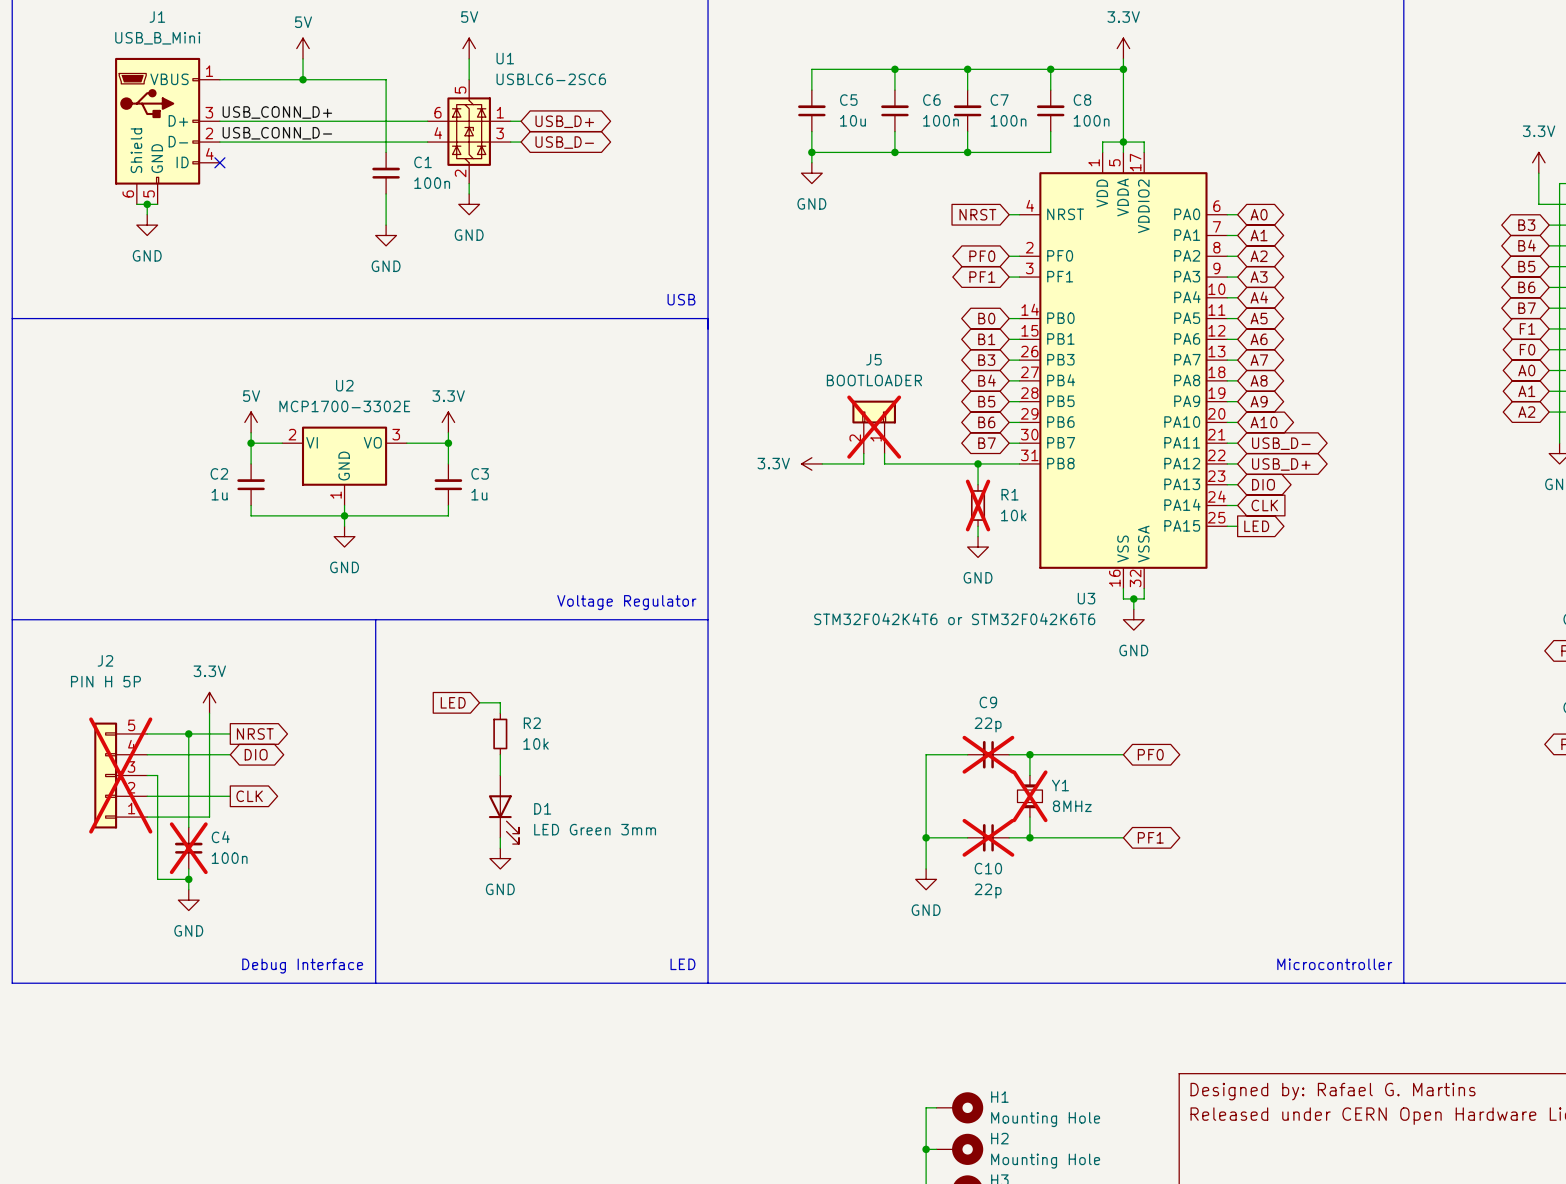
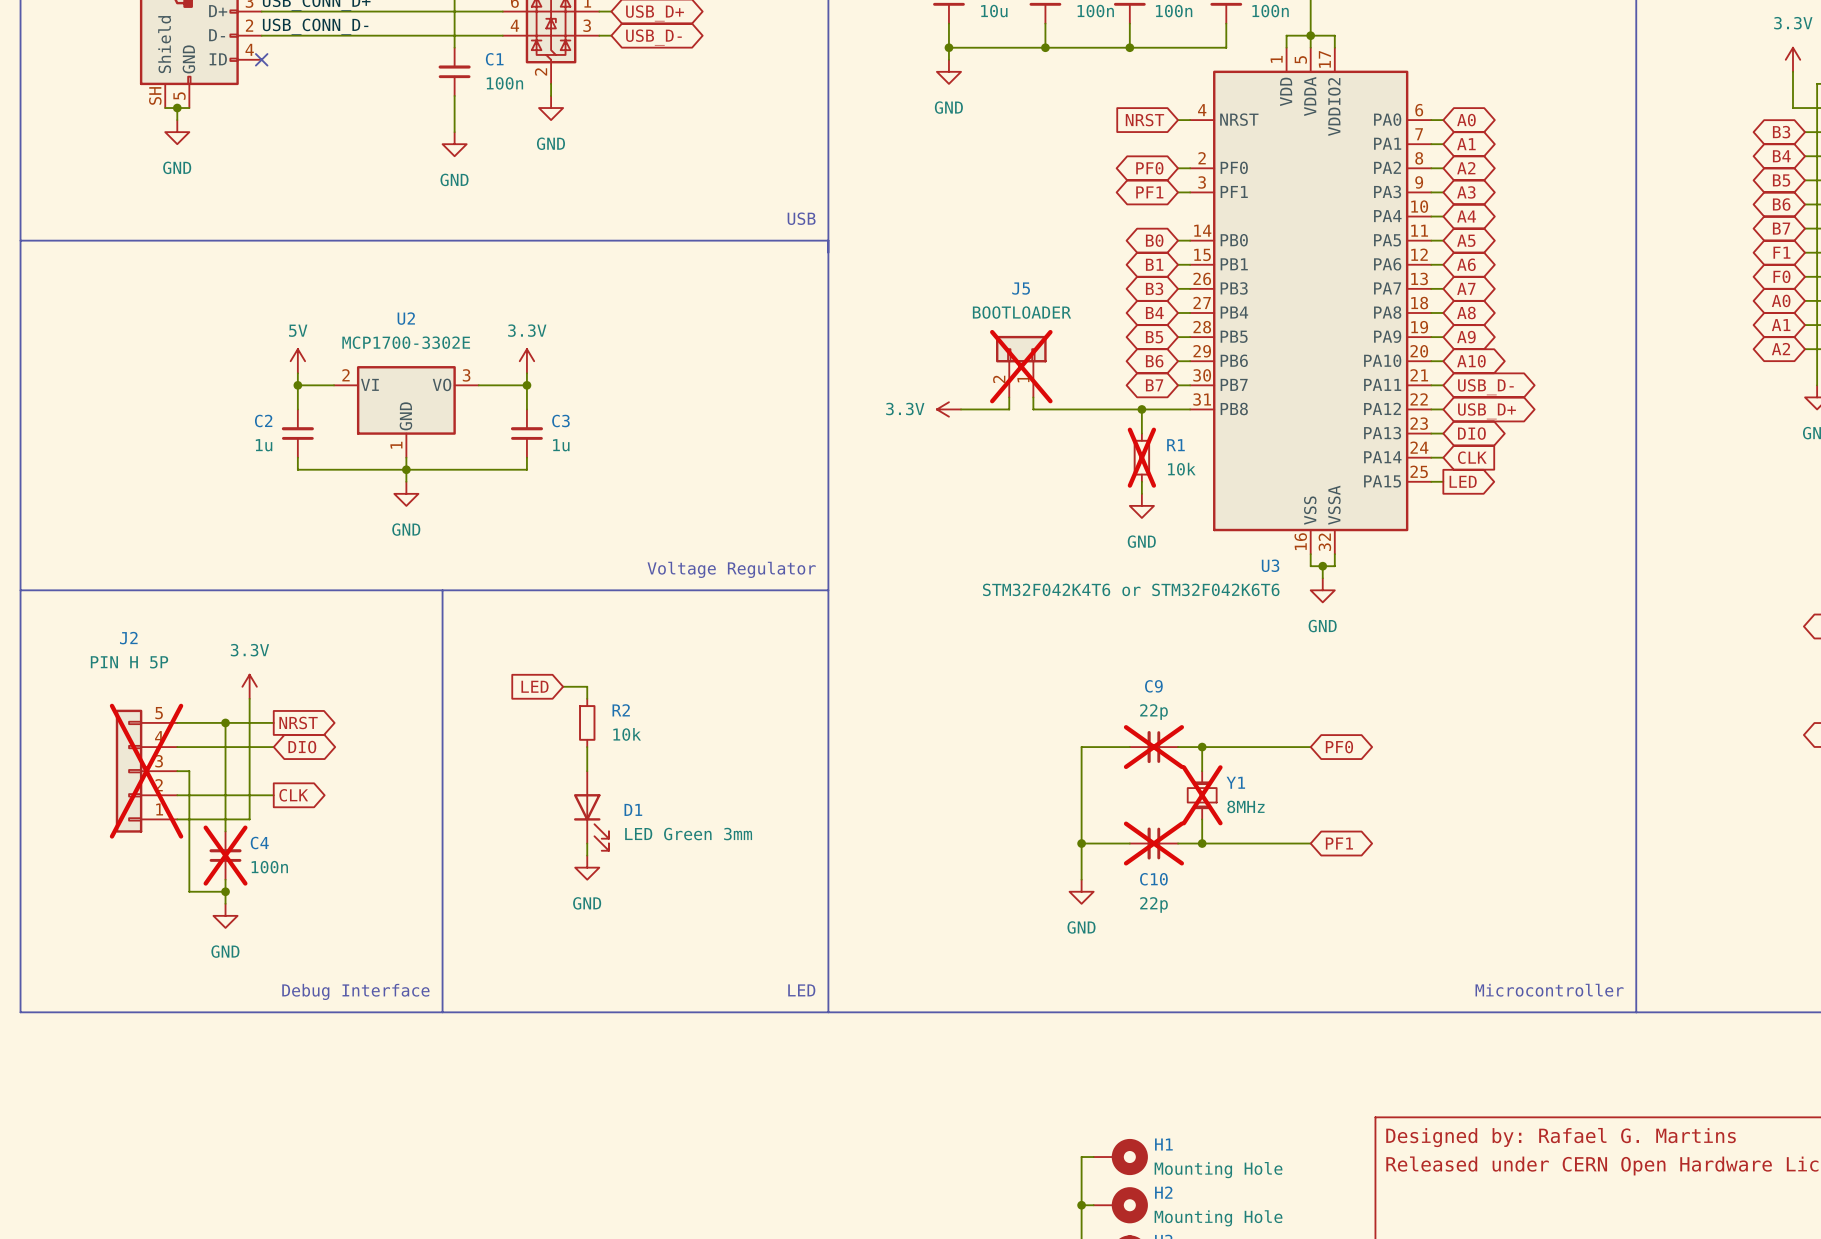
J1 pin number: 6 (128, 193) -> SH (155, 95)

